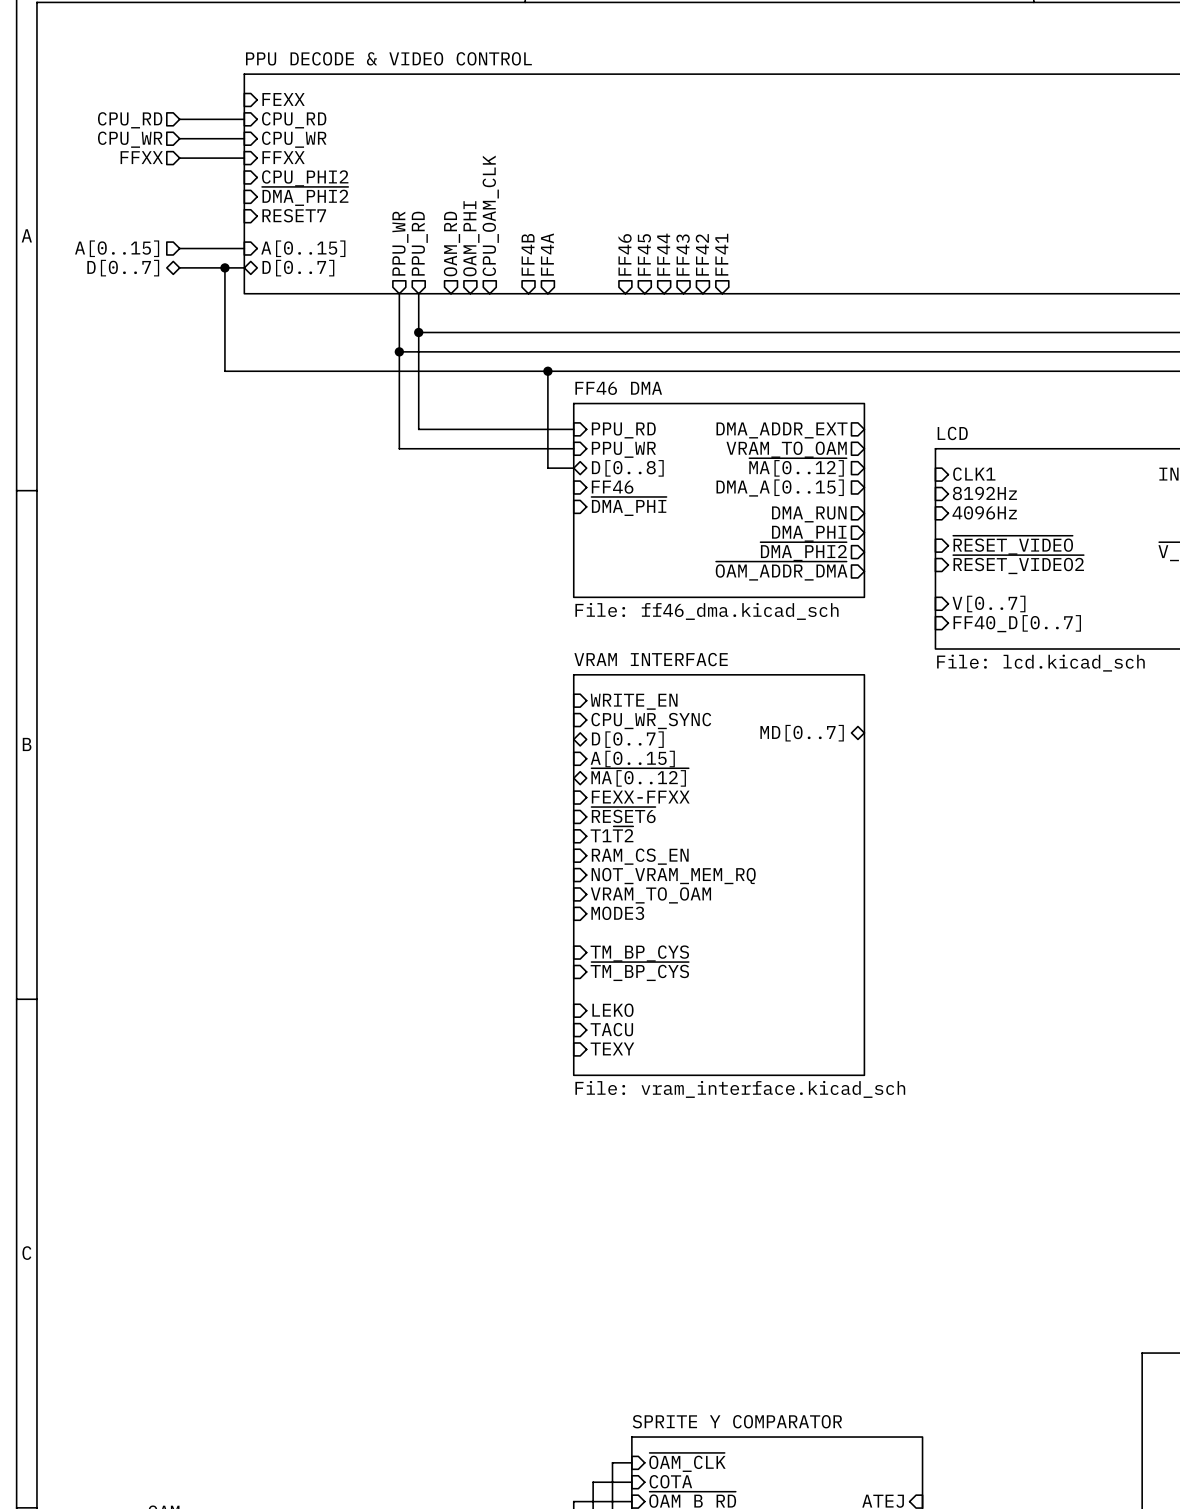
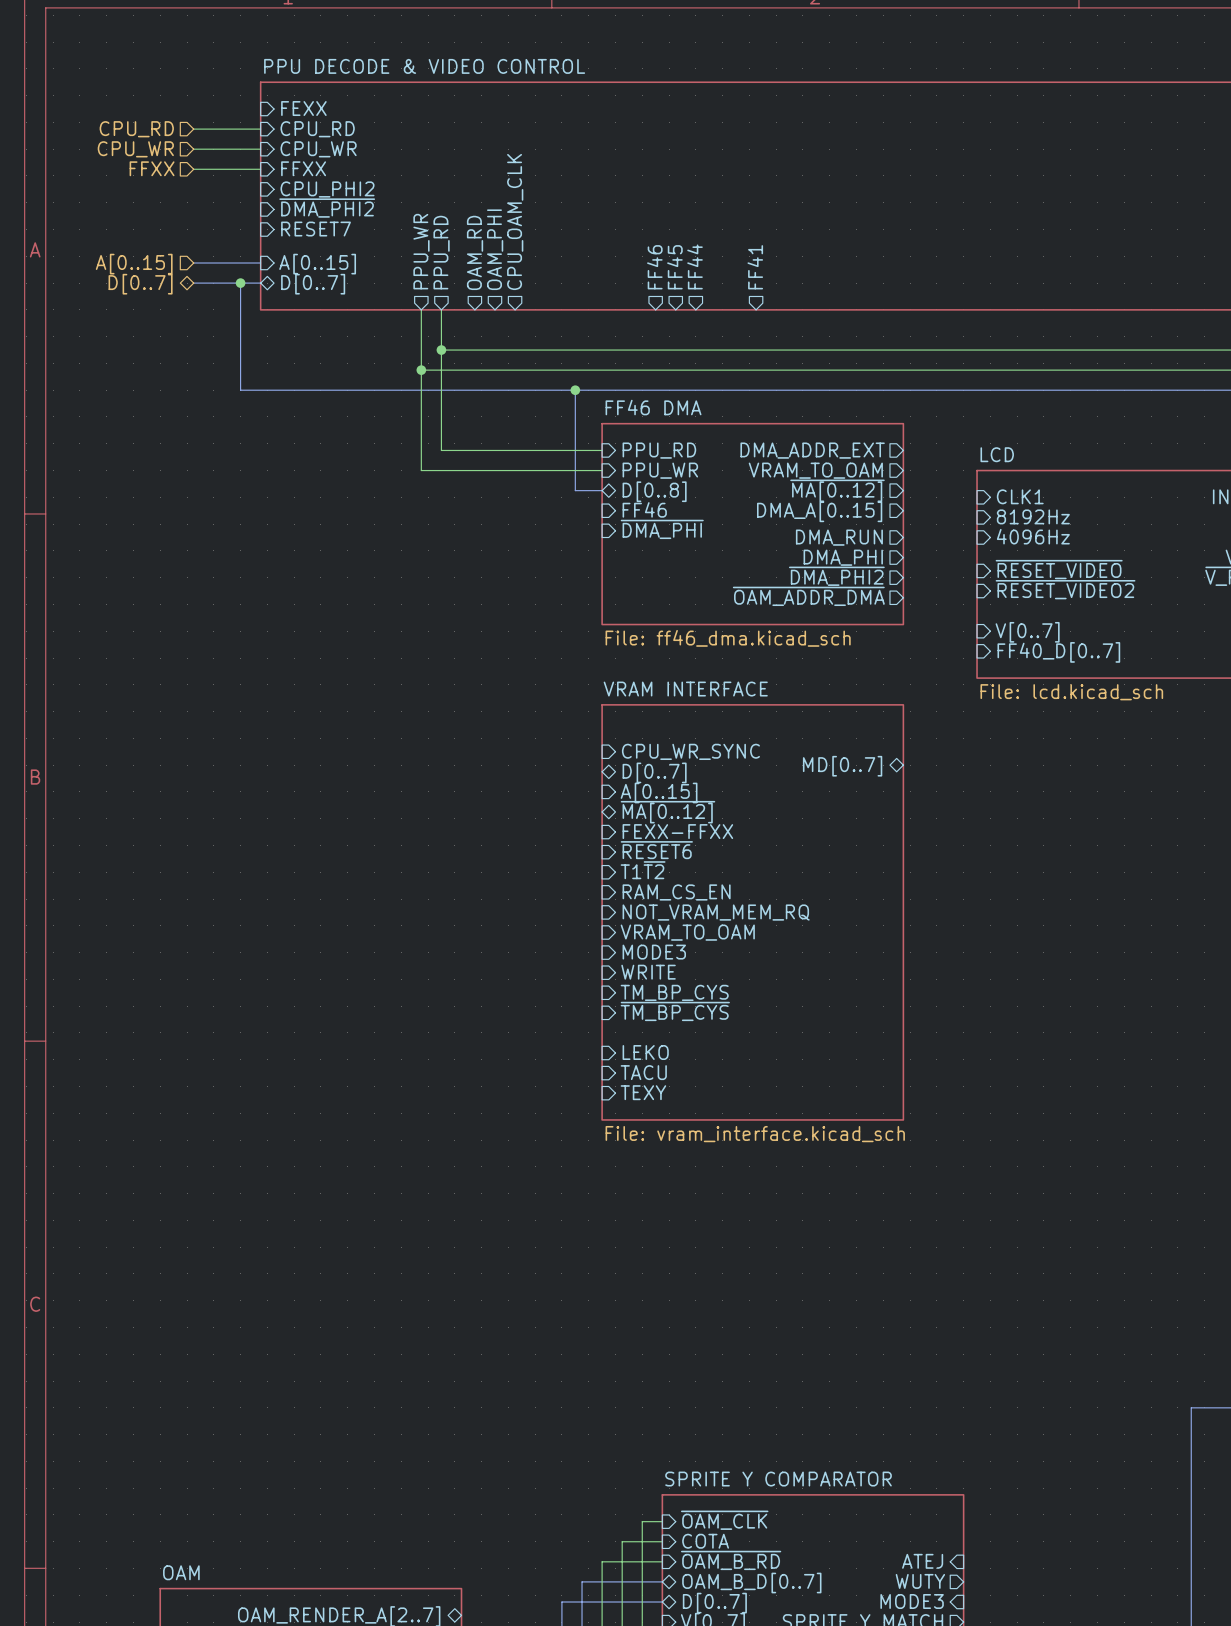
sheet pin: FF4B (528, 254) -> none
sheet pin: FF4A (547, 254) -> none
sheet pin: FF42 (702, 254) -> none
sheet pin: FF43 (683, 255) -> none
sheet pin: WRITE_EN (634, 701) -> none
sheet pin: none -> WRITE (648, 972)

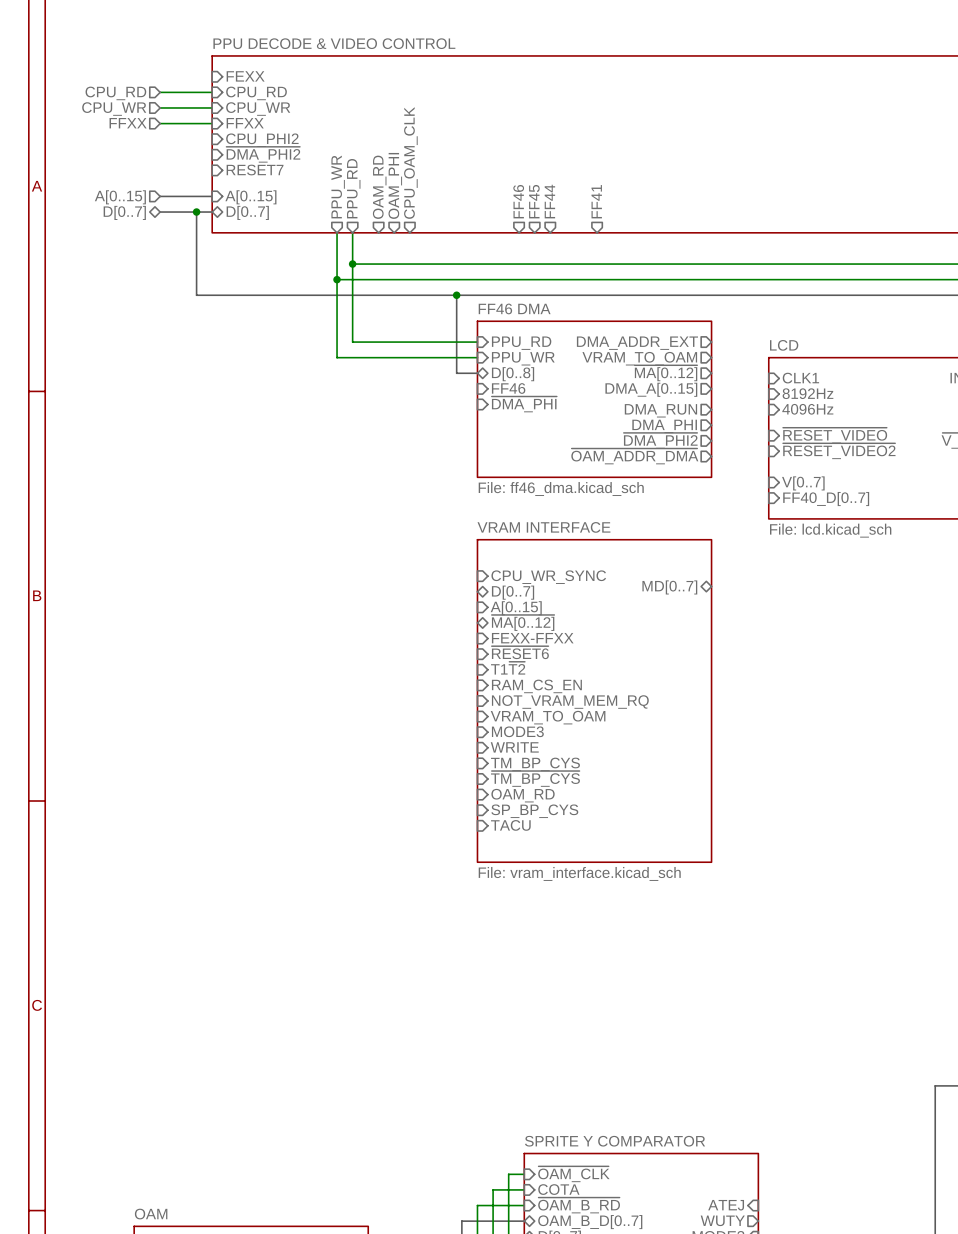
sheet pin: none -> OAM_RD (523, 795)
sheet pin: LEKO (645, 1052) -> SP_BP_CYS (534, 811)
sheet pin: TEXY (643, 1092) -> none

